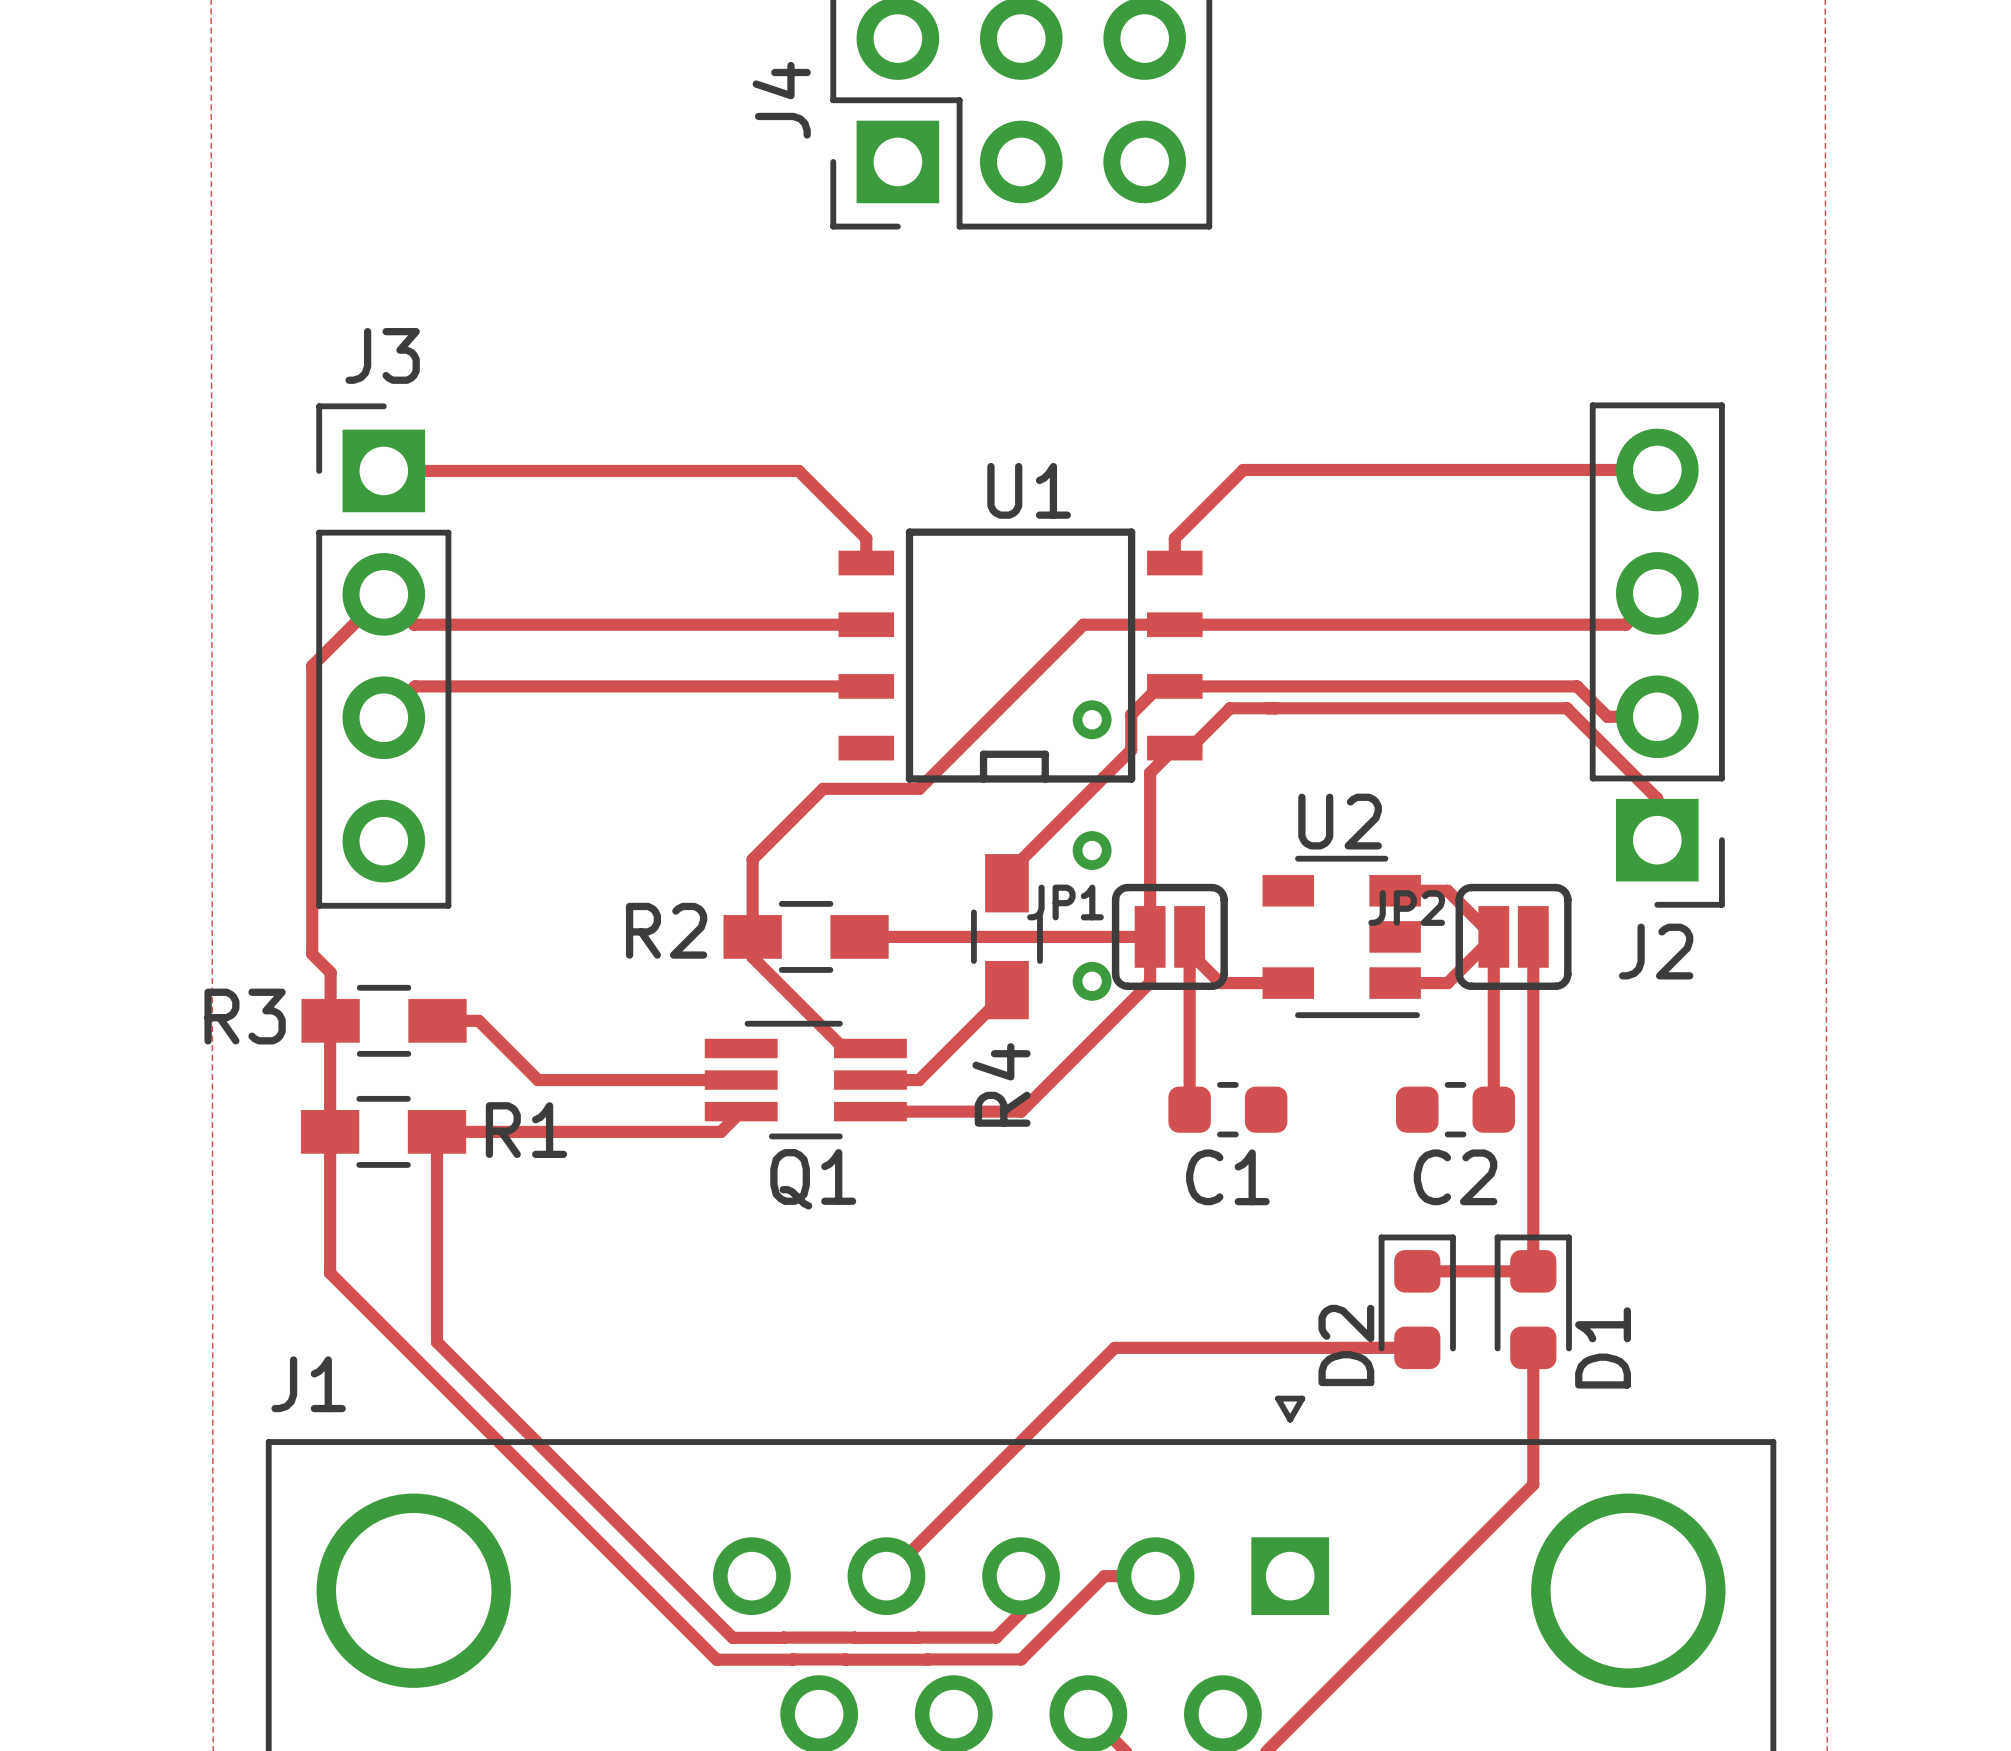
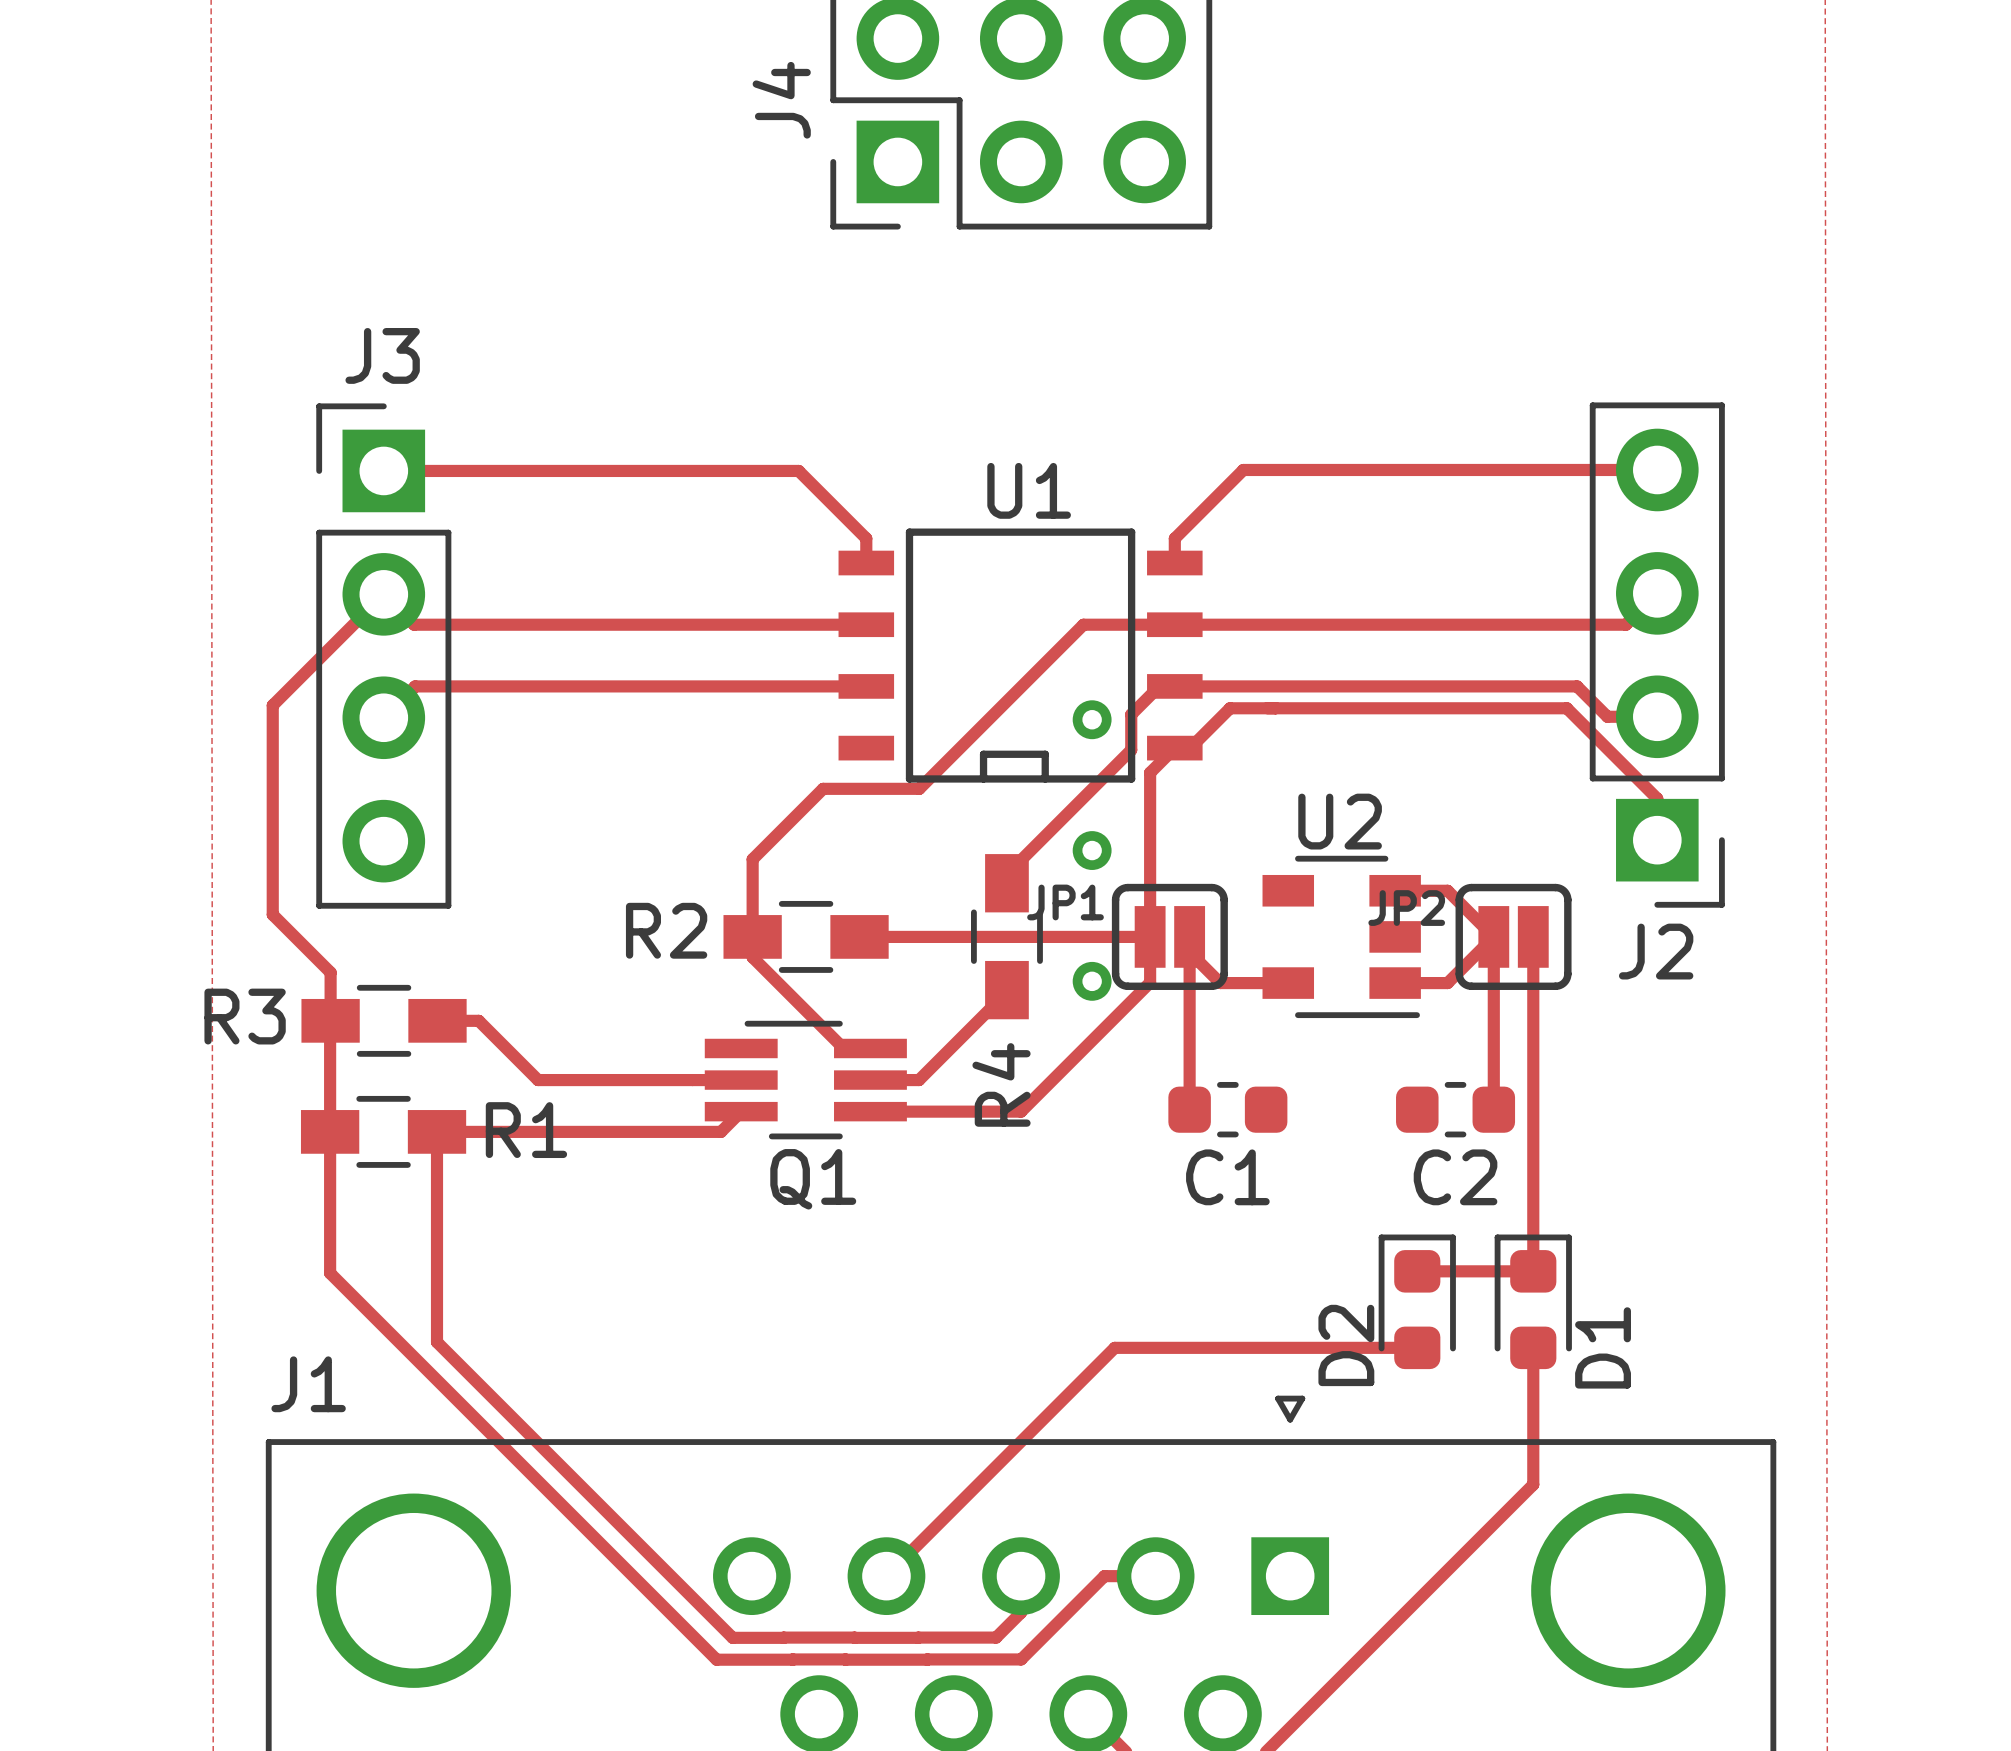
track: (312, 665) (312, 954) -> (312, 665) (272, 705) (272, 914) (312, 954)

